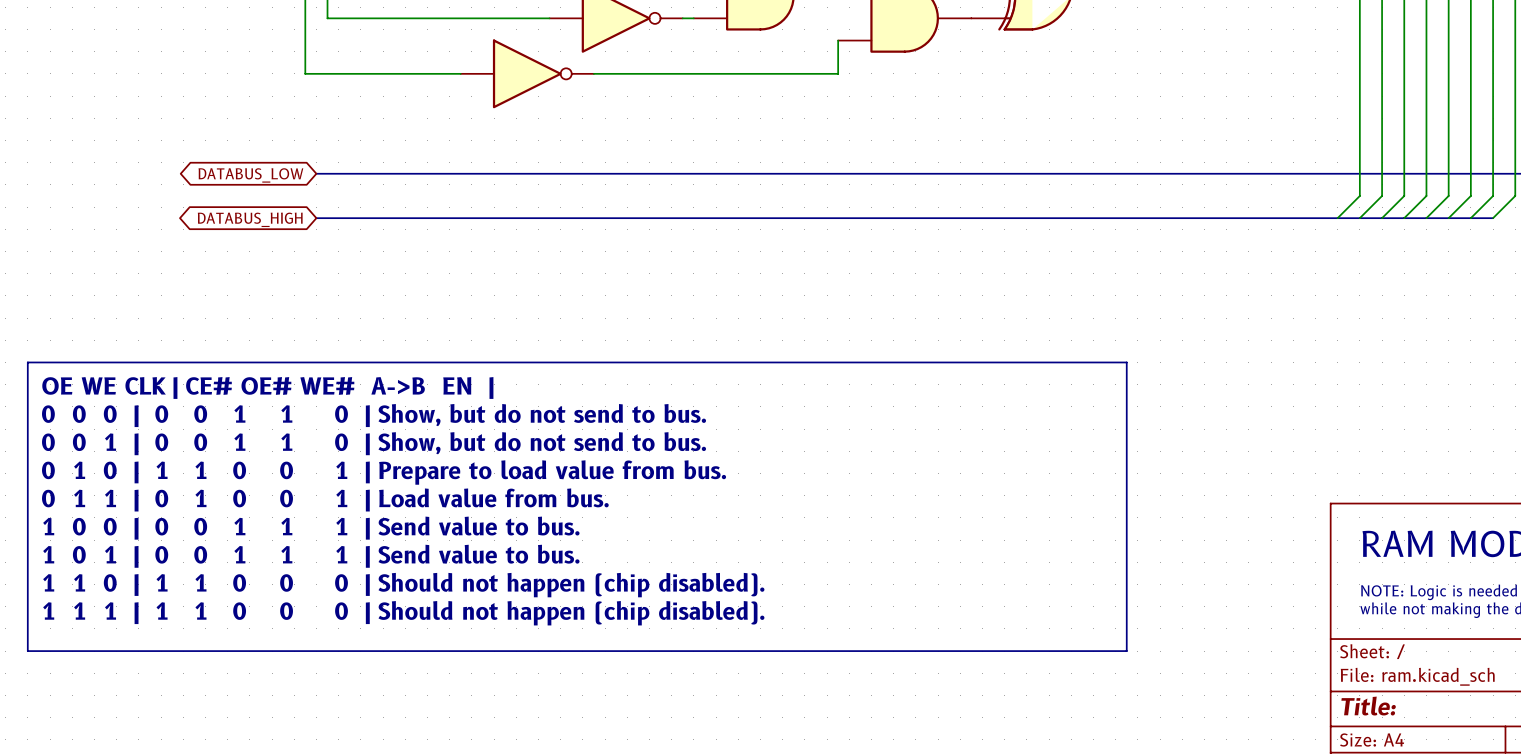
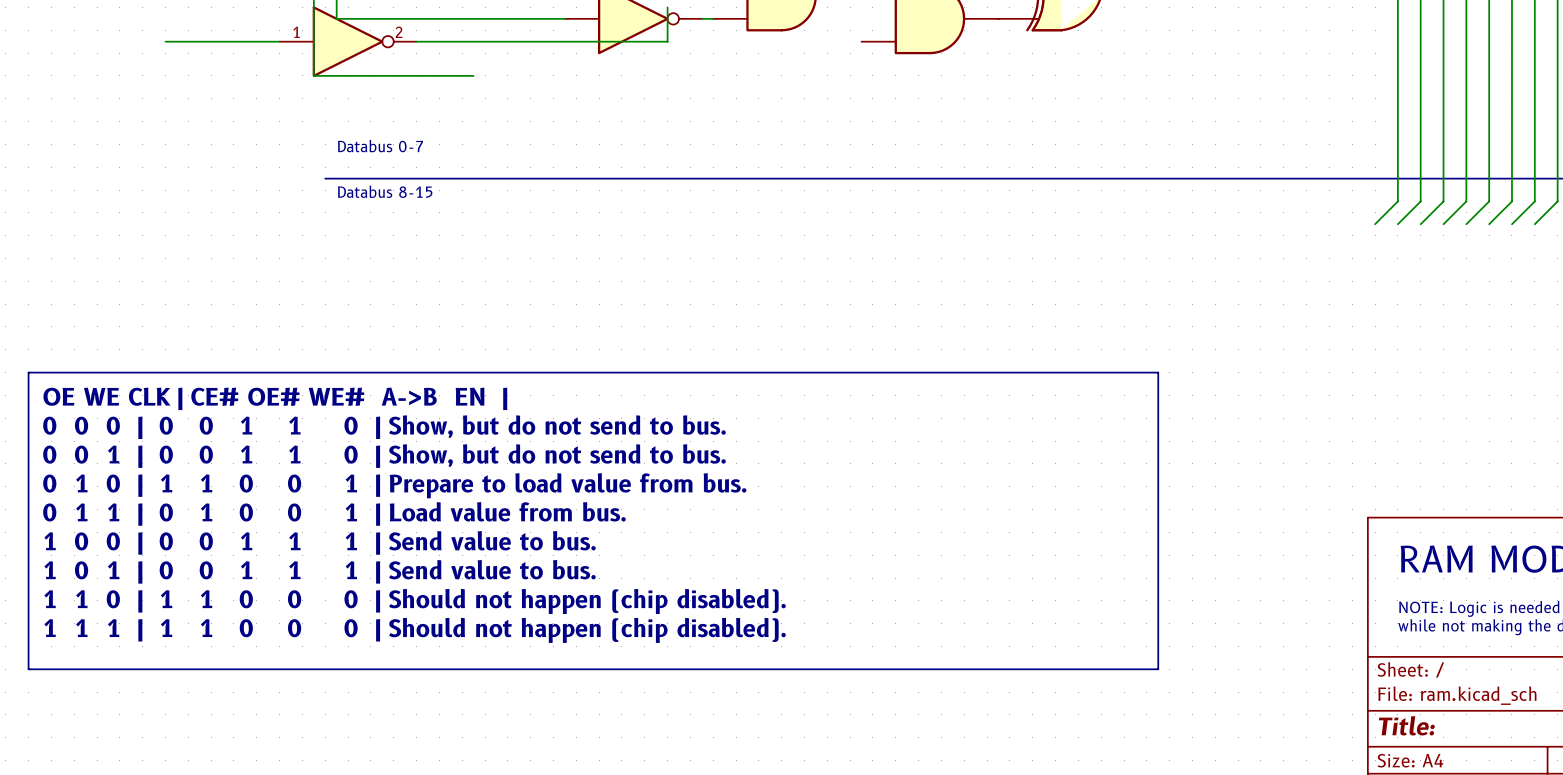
wire: none -> (165, 41) (279, 41)
part: none -> (348, 41)
wire: (838, 40) (838, 73) (593, 73) -> (667, 7) (667, 41) (416, 41)
part: (527, 73) -> none
text: none -> Databus 0-7 (380, 146)
global label: DATABUS_LOW (250, 175) -> none
text: none -> Databus 8-15 (385, 191)
bus: (316, 218) (1493, 218) -> none
global label: DATABUS_HIGH (250, 219) -> none

